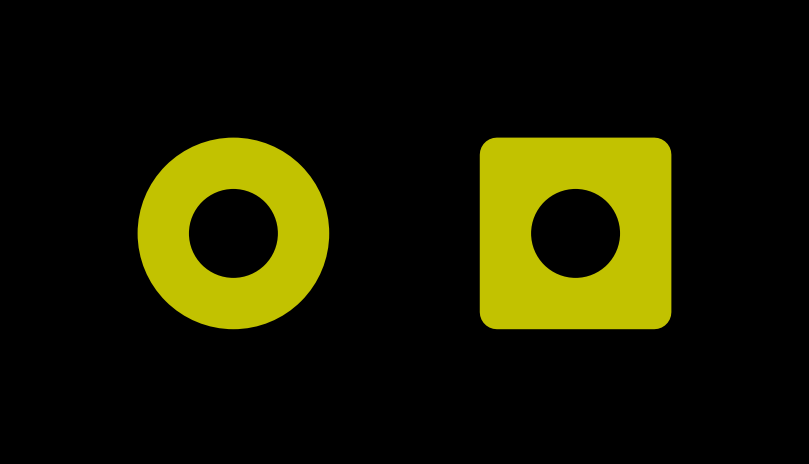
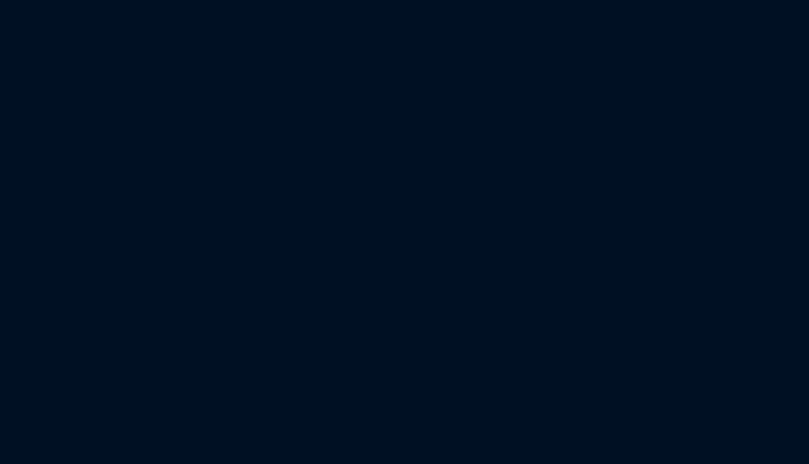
part: (404, 233) -> none

